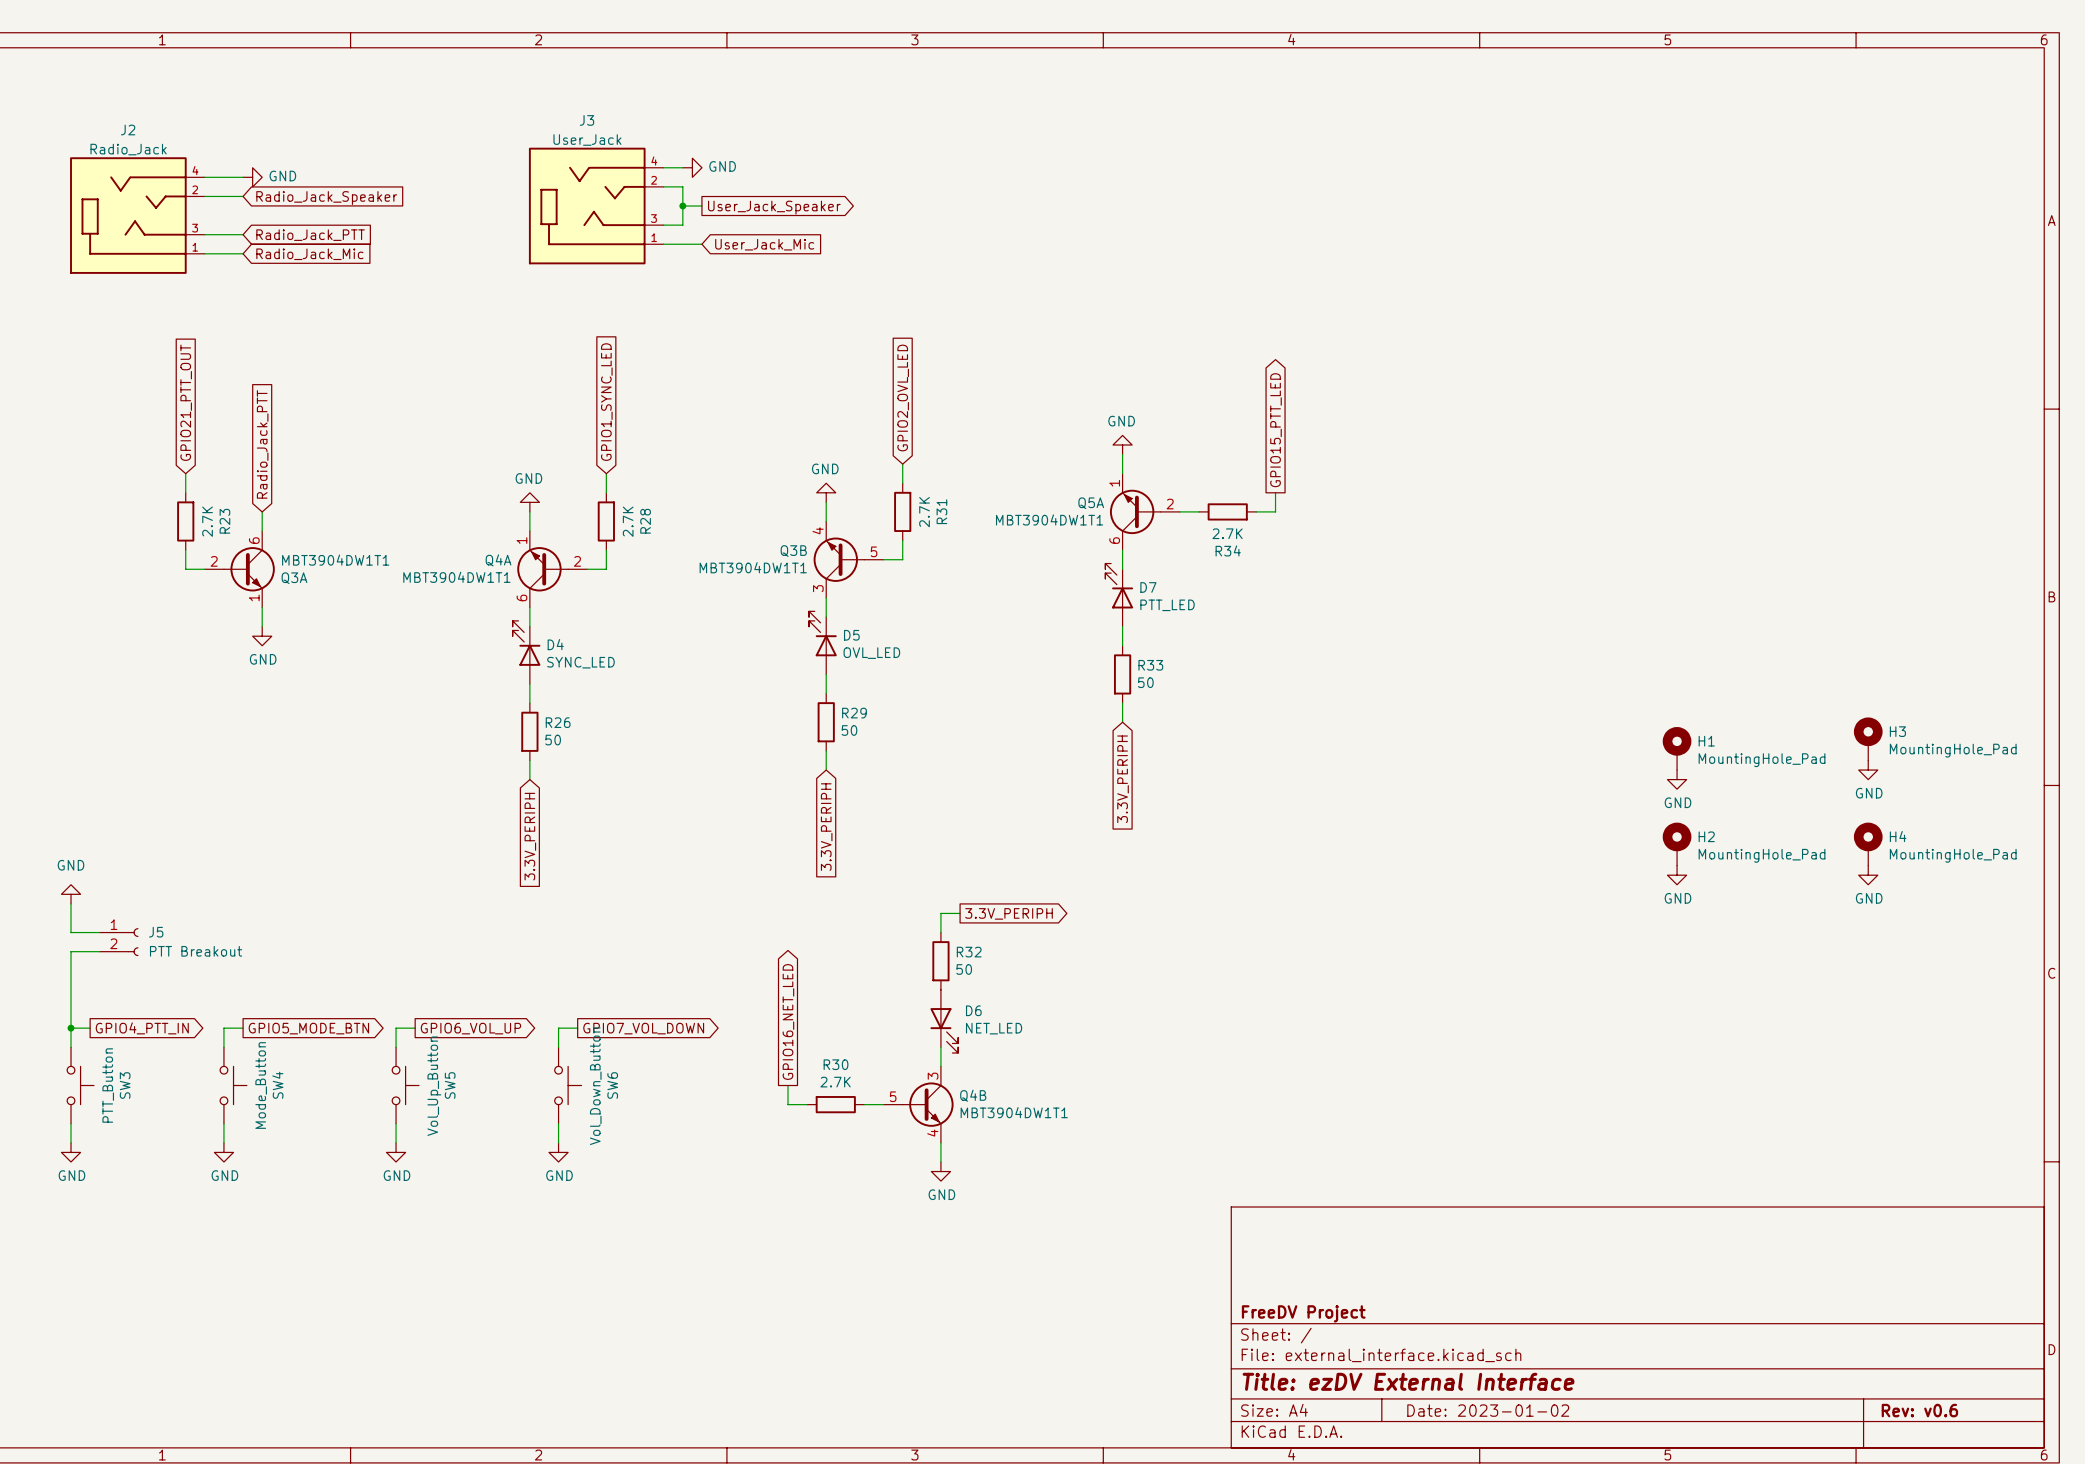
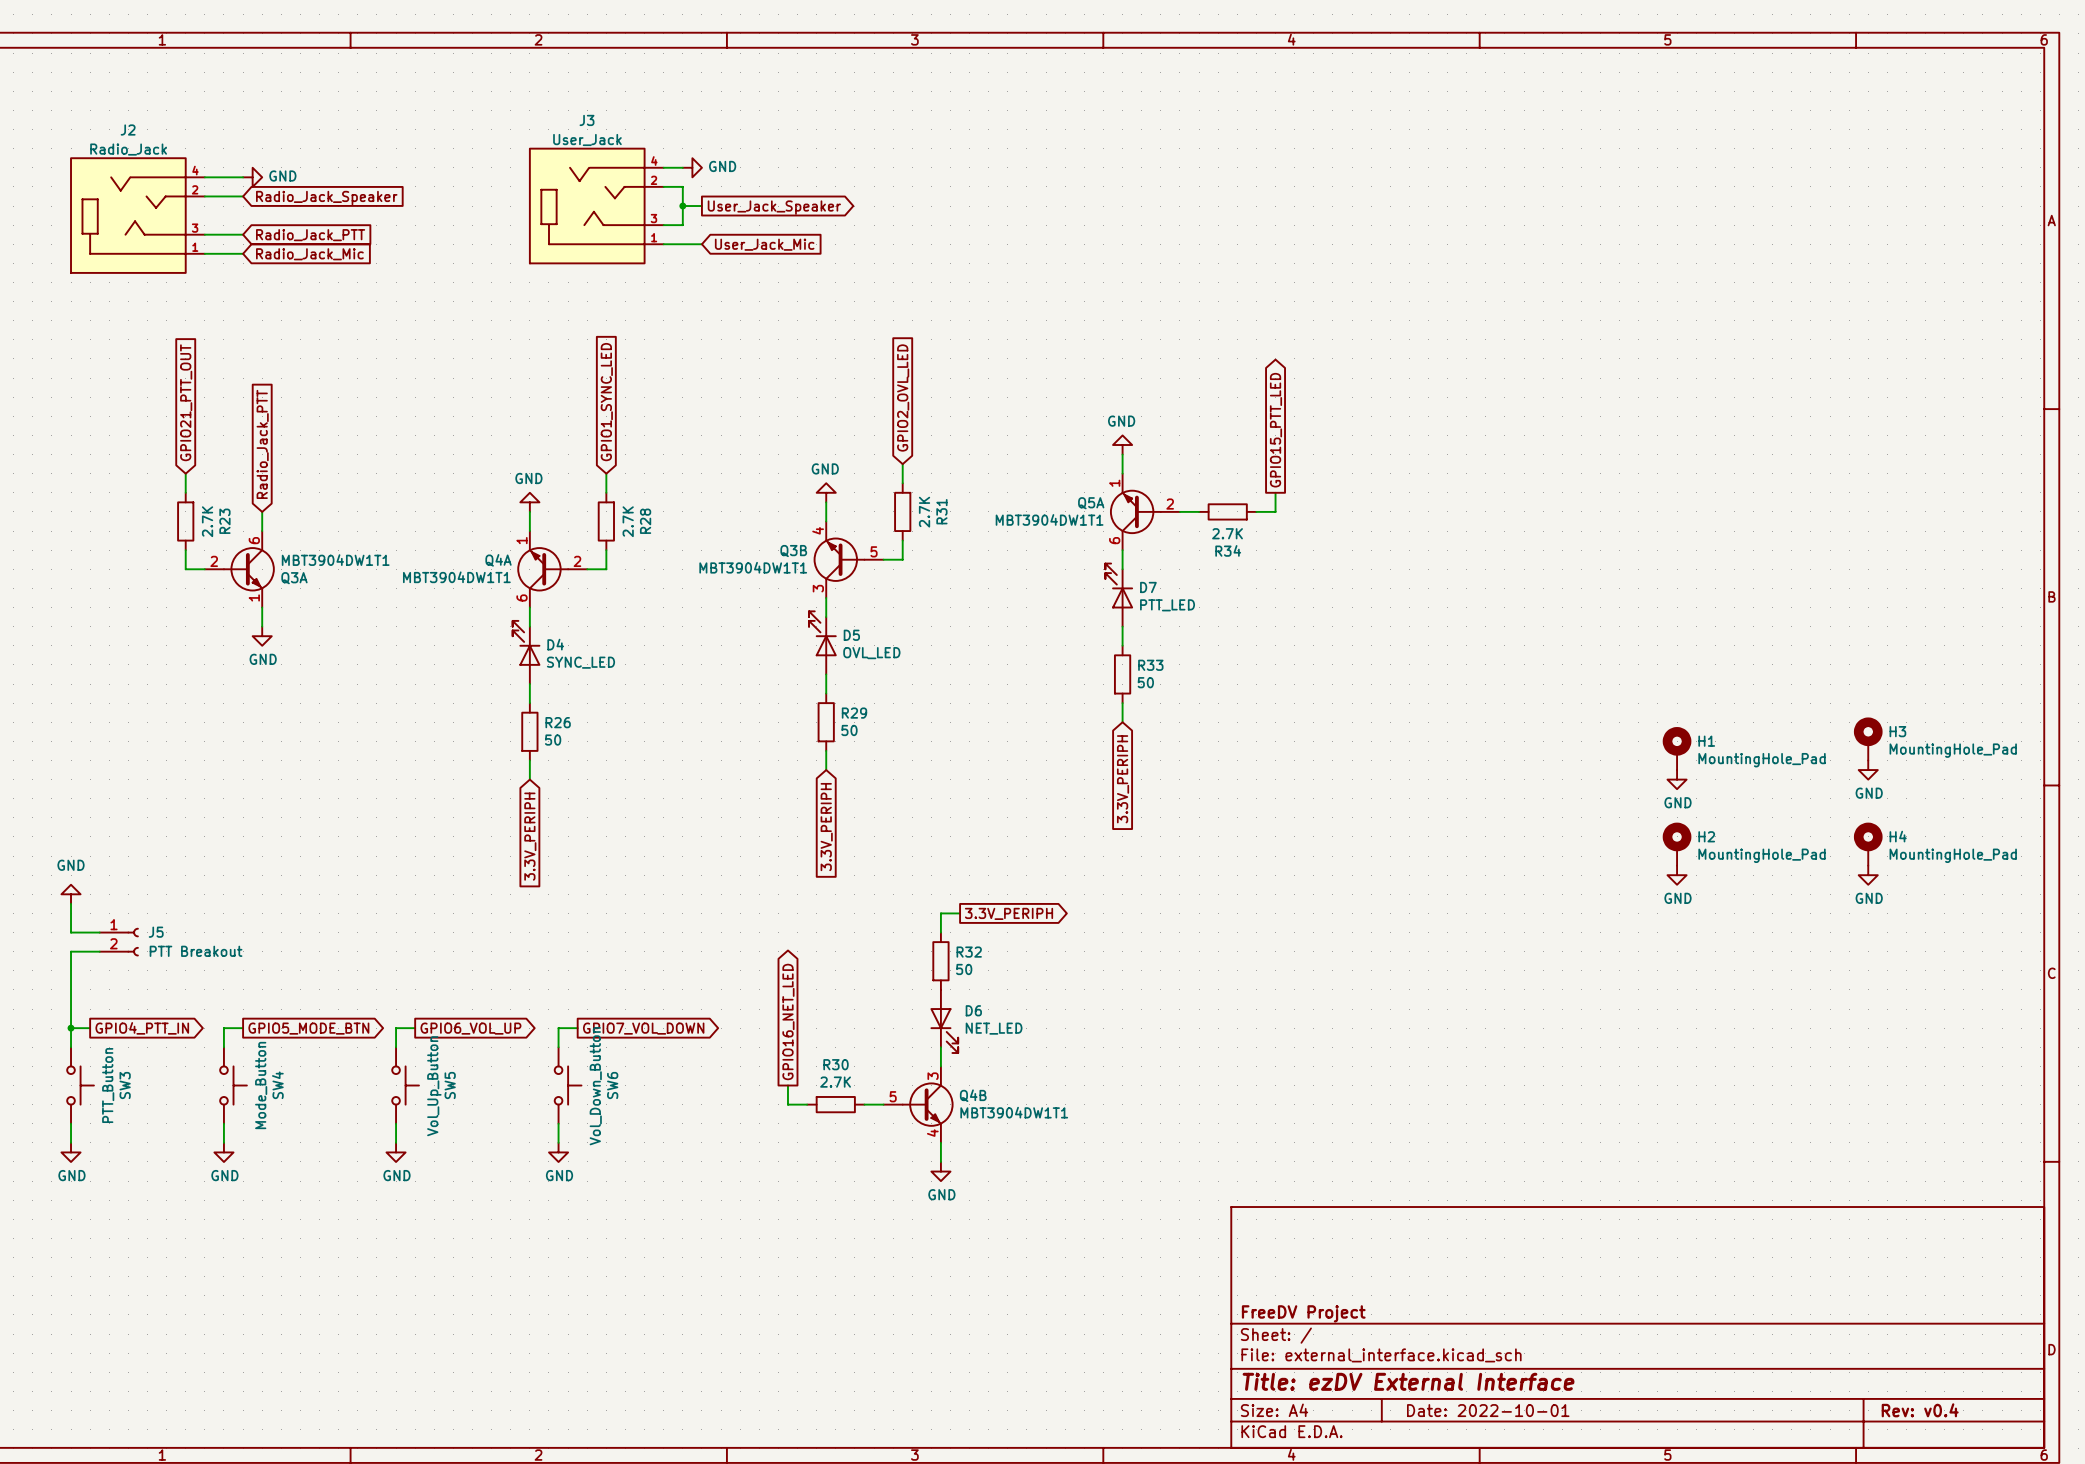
title block: Date: 2023-01-02 (1488, 1410) -> Date: 2022-10-01 (1488, 1410)
title block: Rev: v0.6 (1919, 1410) -> Rev: v0.4 (1920, 1410)

